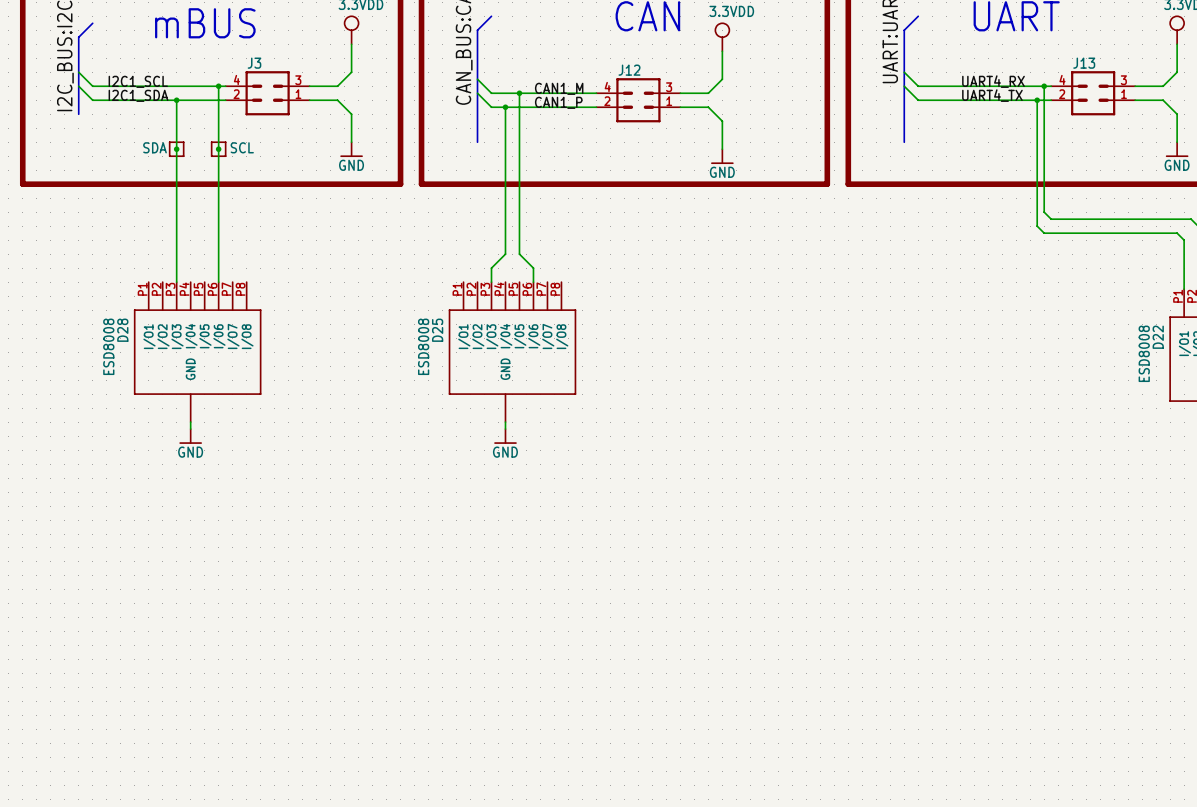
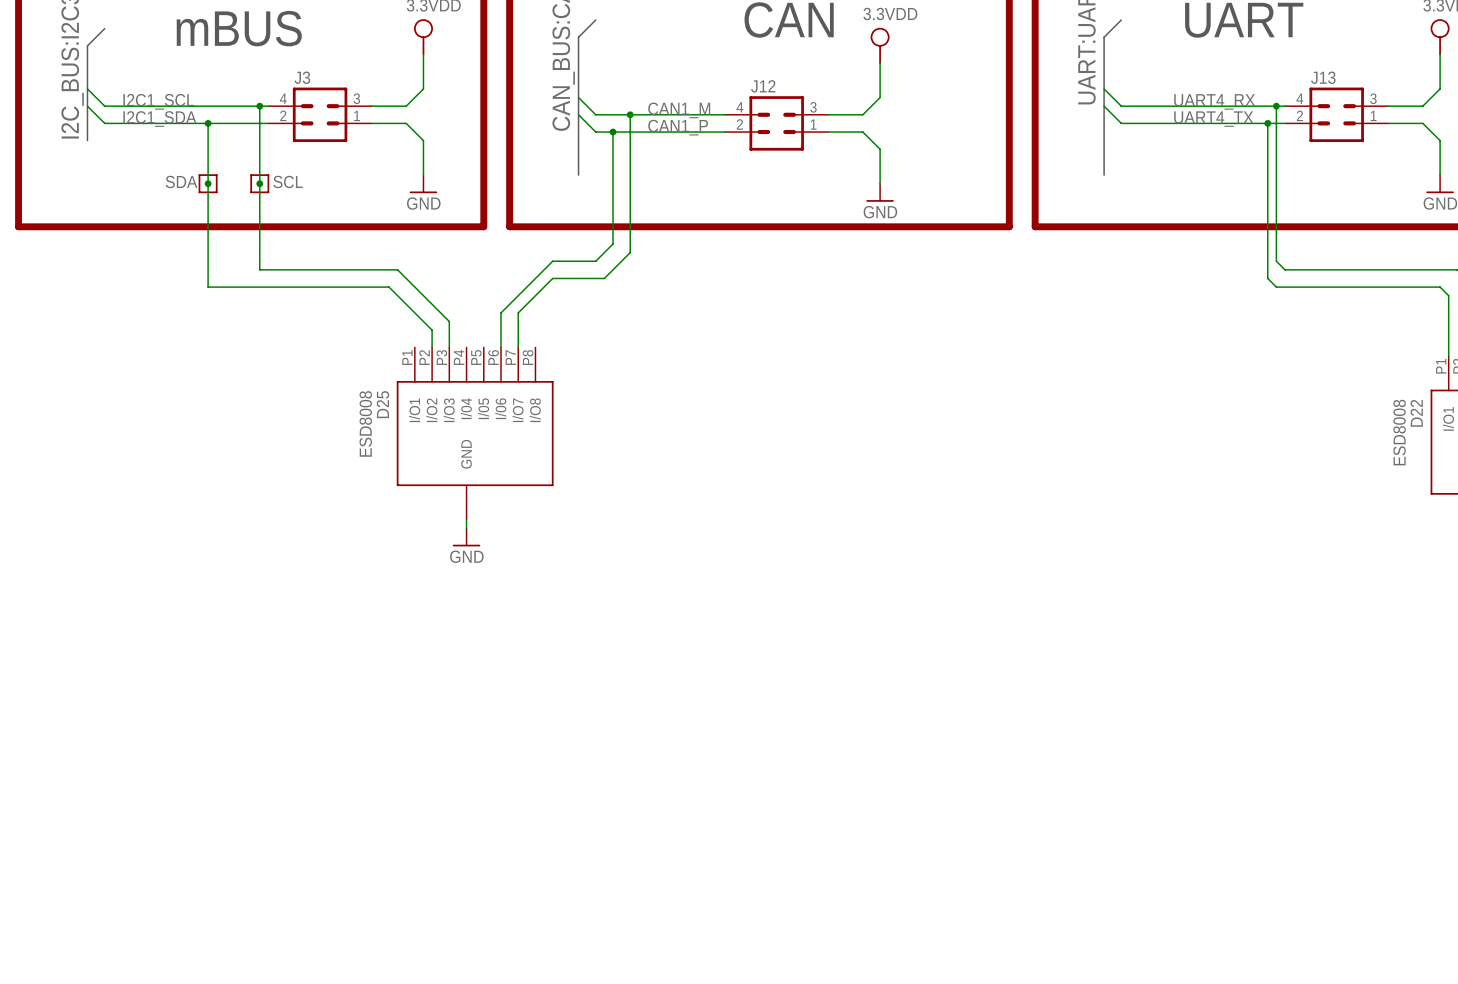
wire: (505, 198) (505, 254) (491, 268) (491, 282) -> (613, 244) (595, 261) (552, 261) (501, 312) (501, 347)
wire: (519, 205) (519, 254) (533, 268) (533, 282) -> (630, 252) (604, 278) (552, 278) (518, 312) (518, 347)
wire: (218, 219) (218, 282) -> (259, 269) (397, 269) (449, 321) (449, 347)
wire: (176, 233) (176, 282) -> (208, 287) (389, 287) (432, 330) (432, 347)
D28: ESD8008 (197, 352) -> none
D25 position: (512, 352) -> (475, 433)
wire: (190, 422) (190, 429) -> none
wire: (505, 422) (505, 429) -> (466, 519) (466, 528)
power symbol: GND (190, 436) -> none
power symbol: none -> GND (466, 537)
power symbol: GND (505, 436) -> none

